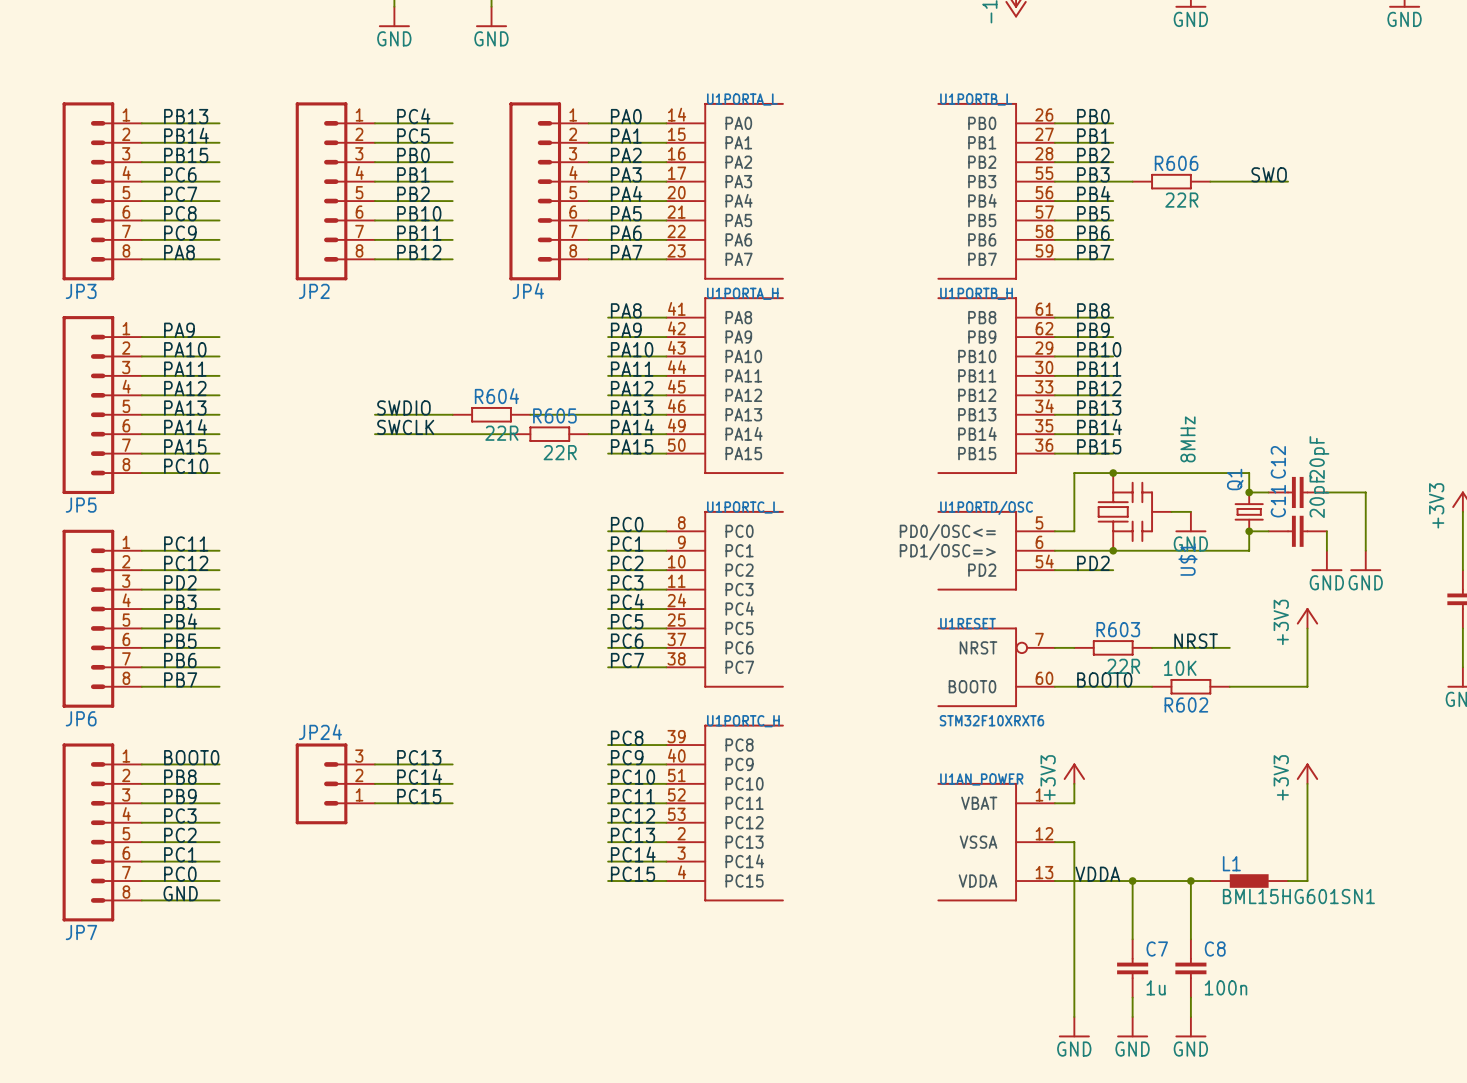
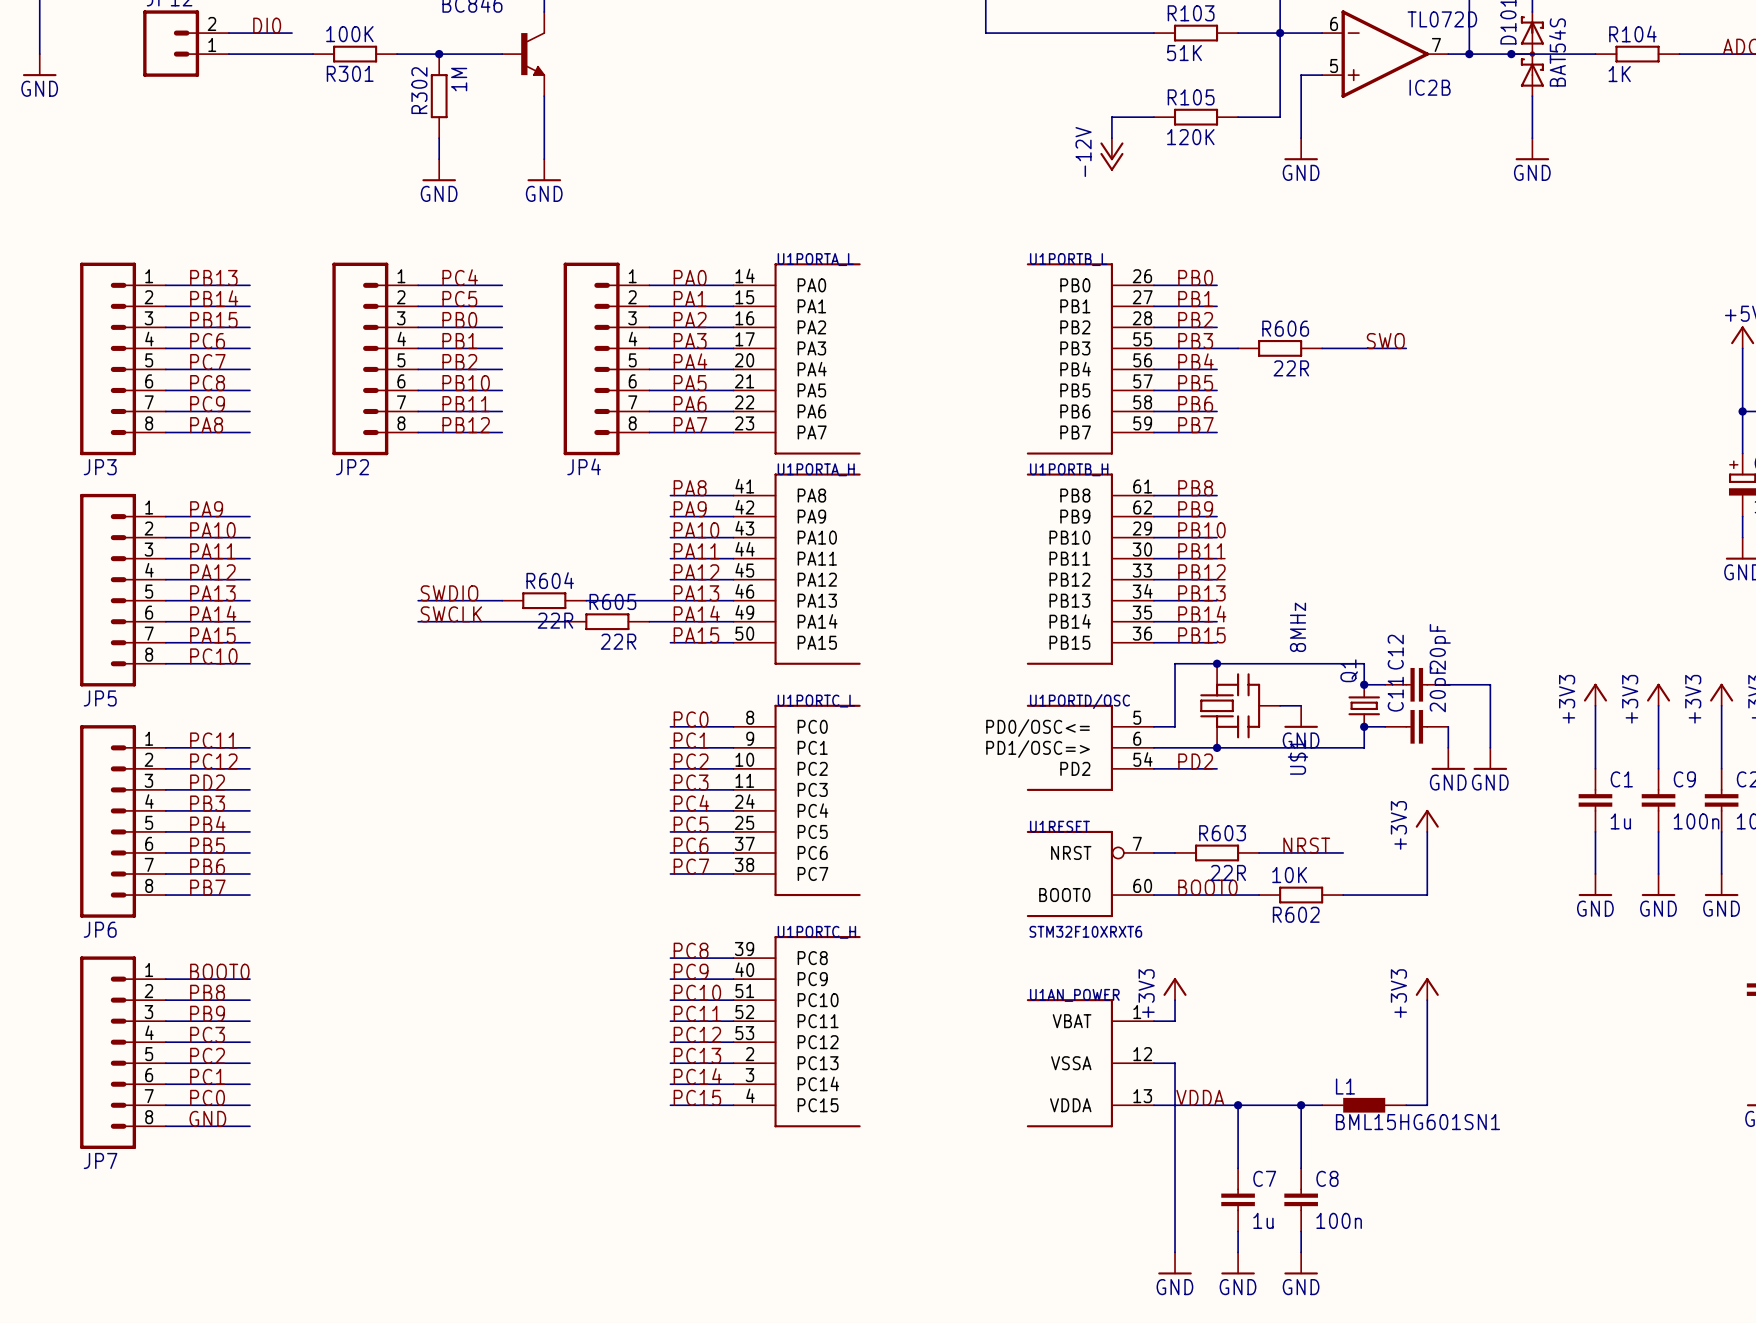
label: PC13 (419, 757) -> none
wire: (374, 764) (452, 764) -> none
label: PC14 (419, 776) -> none
JP24: (335, 783) -> none
wire: (374, 783) (452, 783) -> none
label: PC15 (419, 796) -> none
wire: (374, 803) (452, 803) -> none

